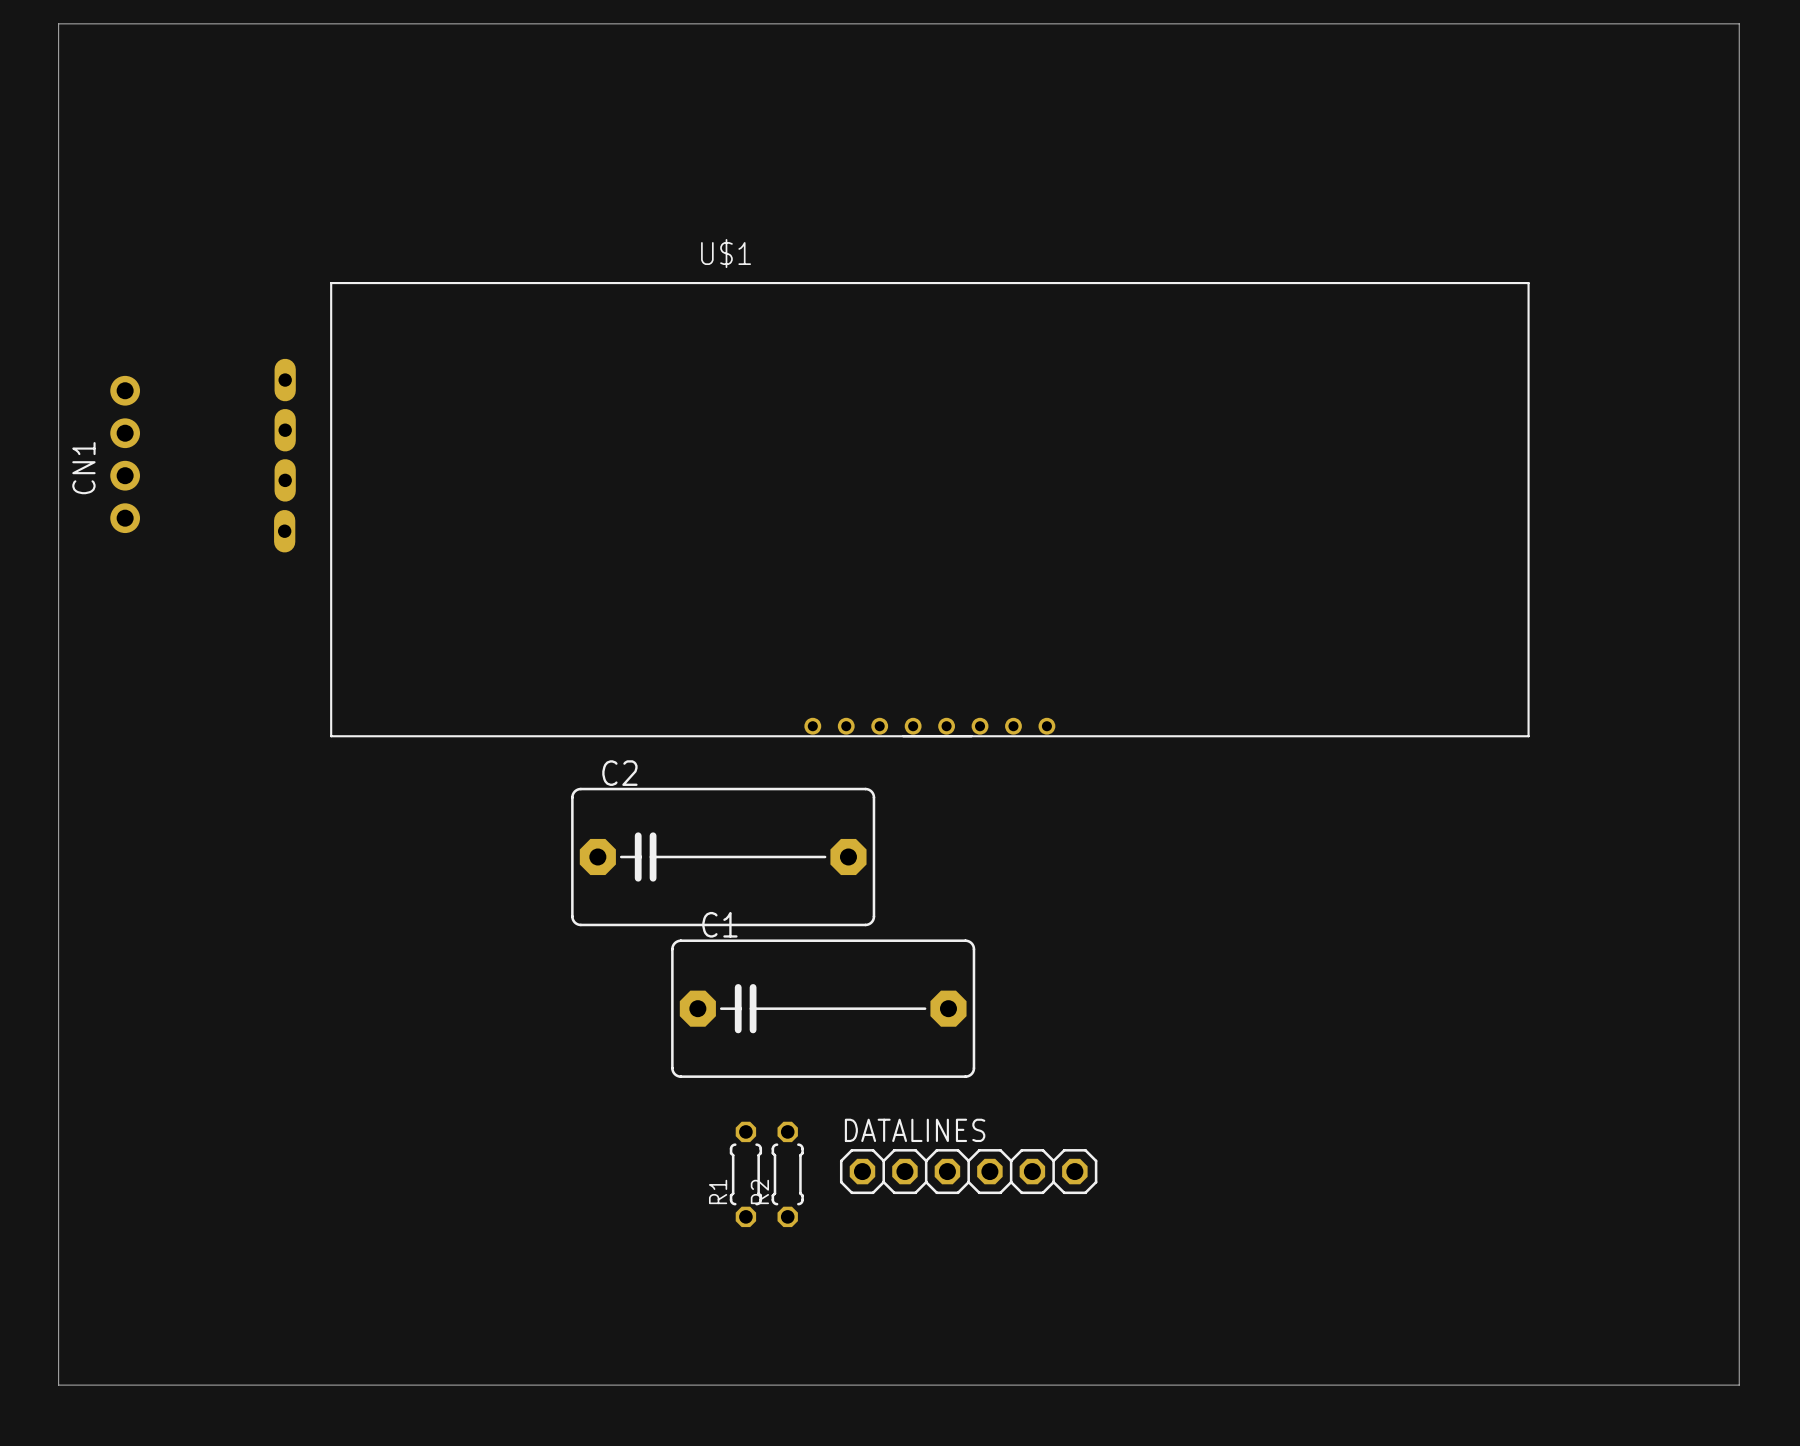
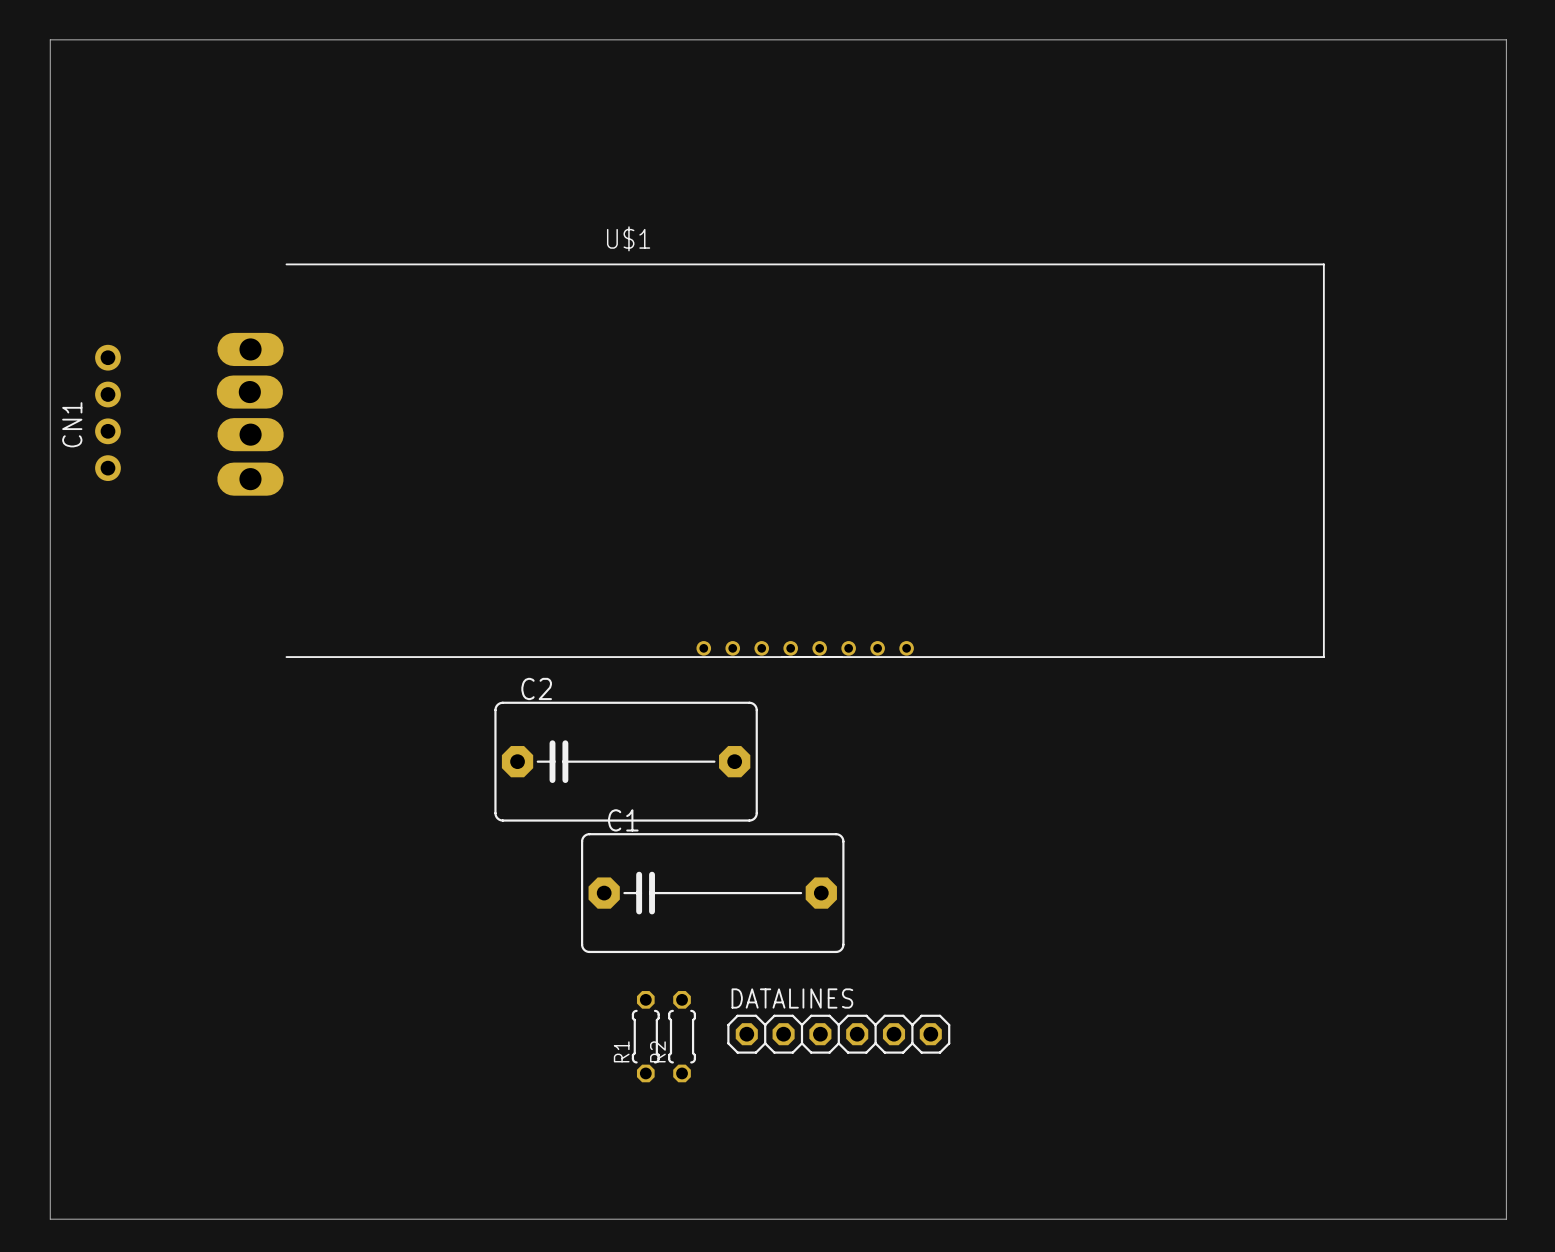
U$1 footprint: [274, 281, 1530, 738] -> [216, 263, 1325, 658]

